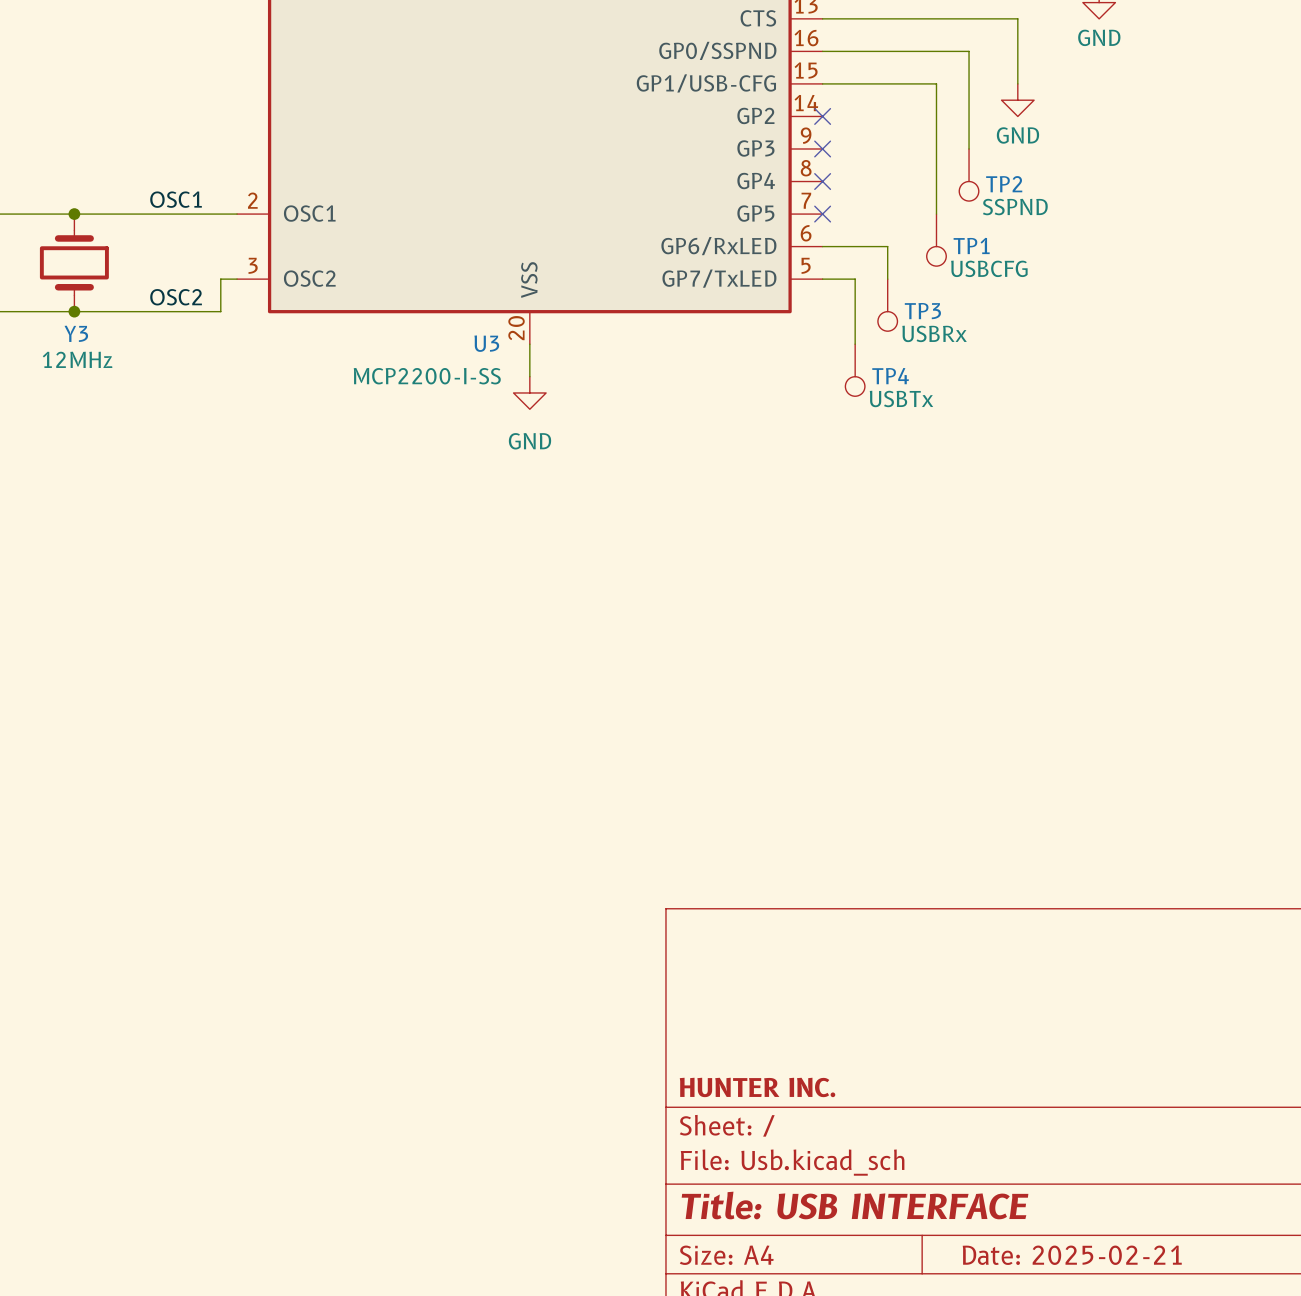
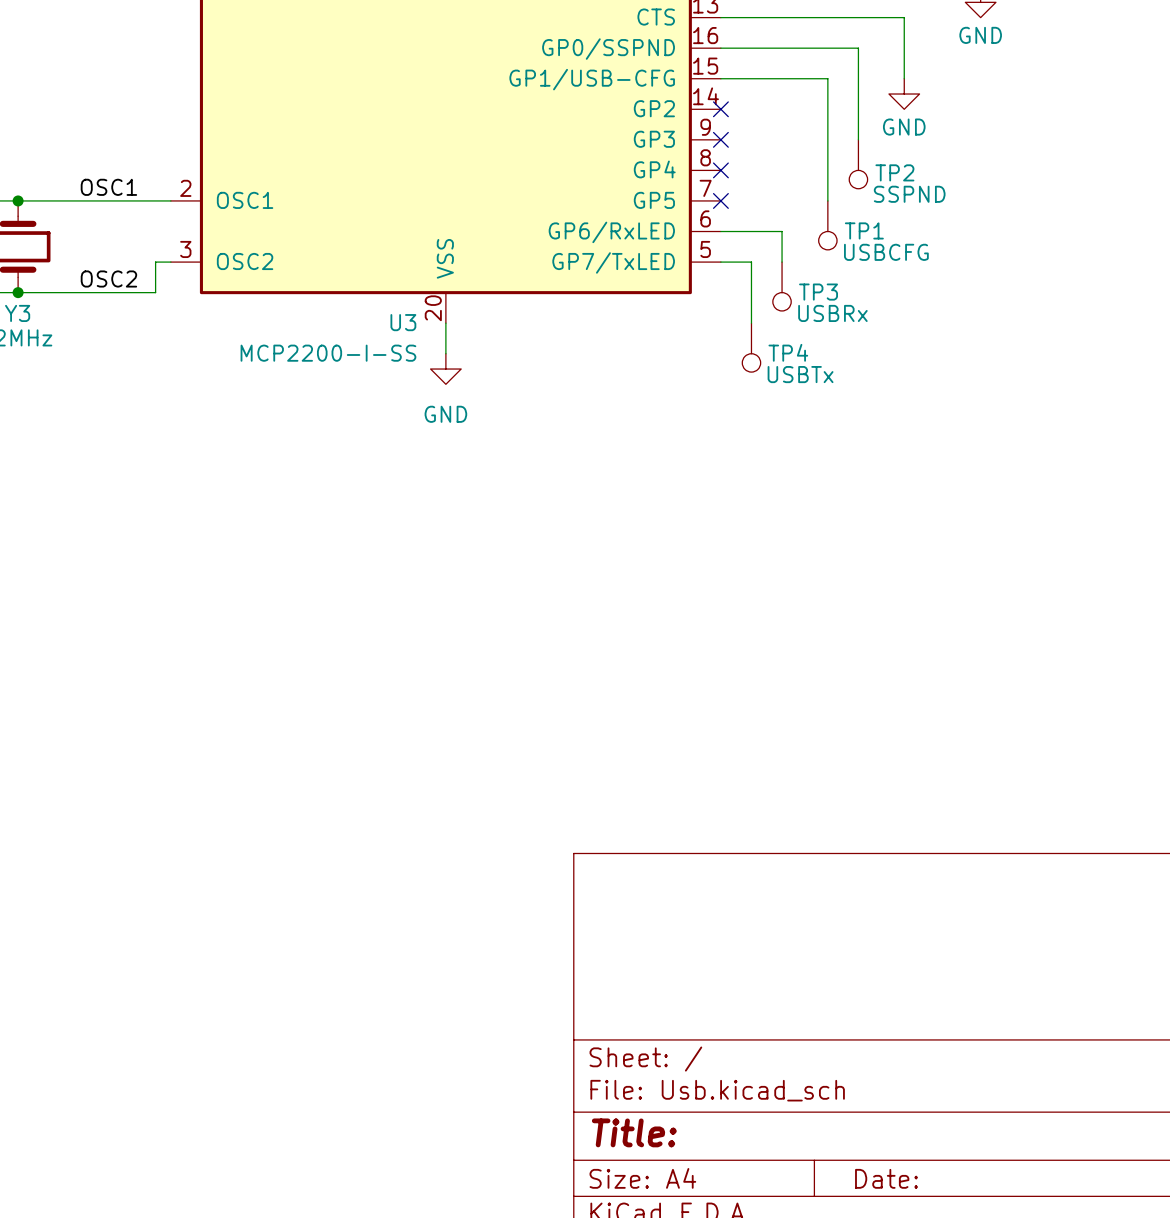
title block: HUNTER INC. (757, 1087) -> none
title block: Title: USB INTERFACE (855, 1205) -> Title: (634, 1132)
title block: Date: 2025-02-21 (1072, 1255) -> Date: (886, 1178)

